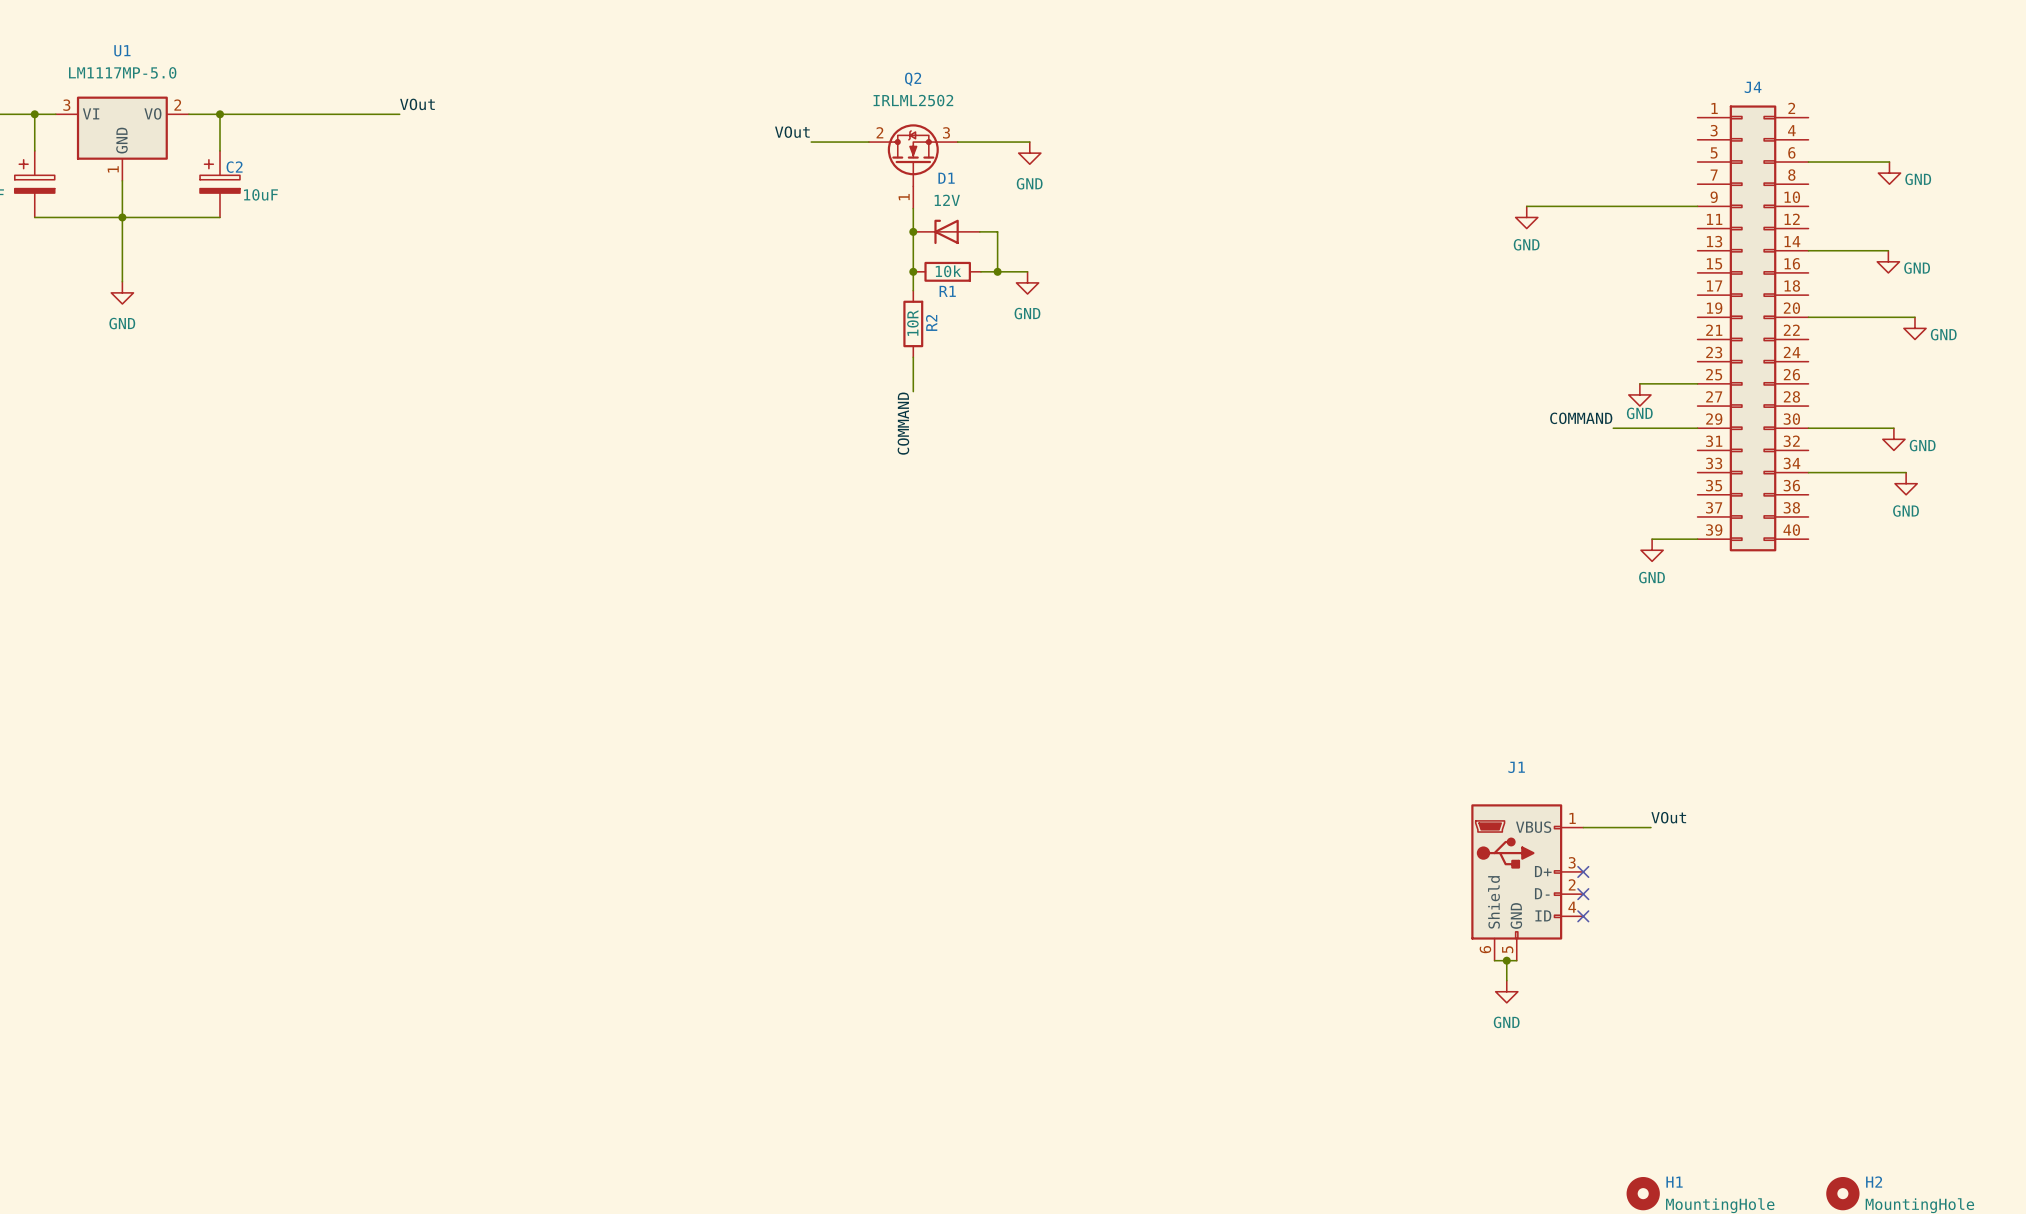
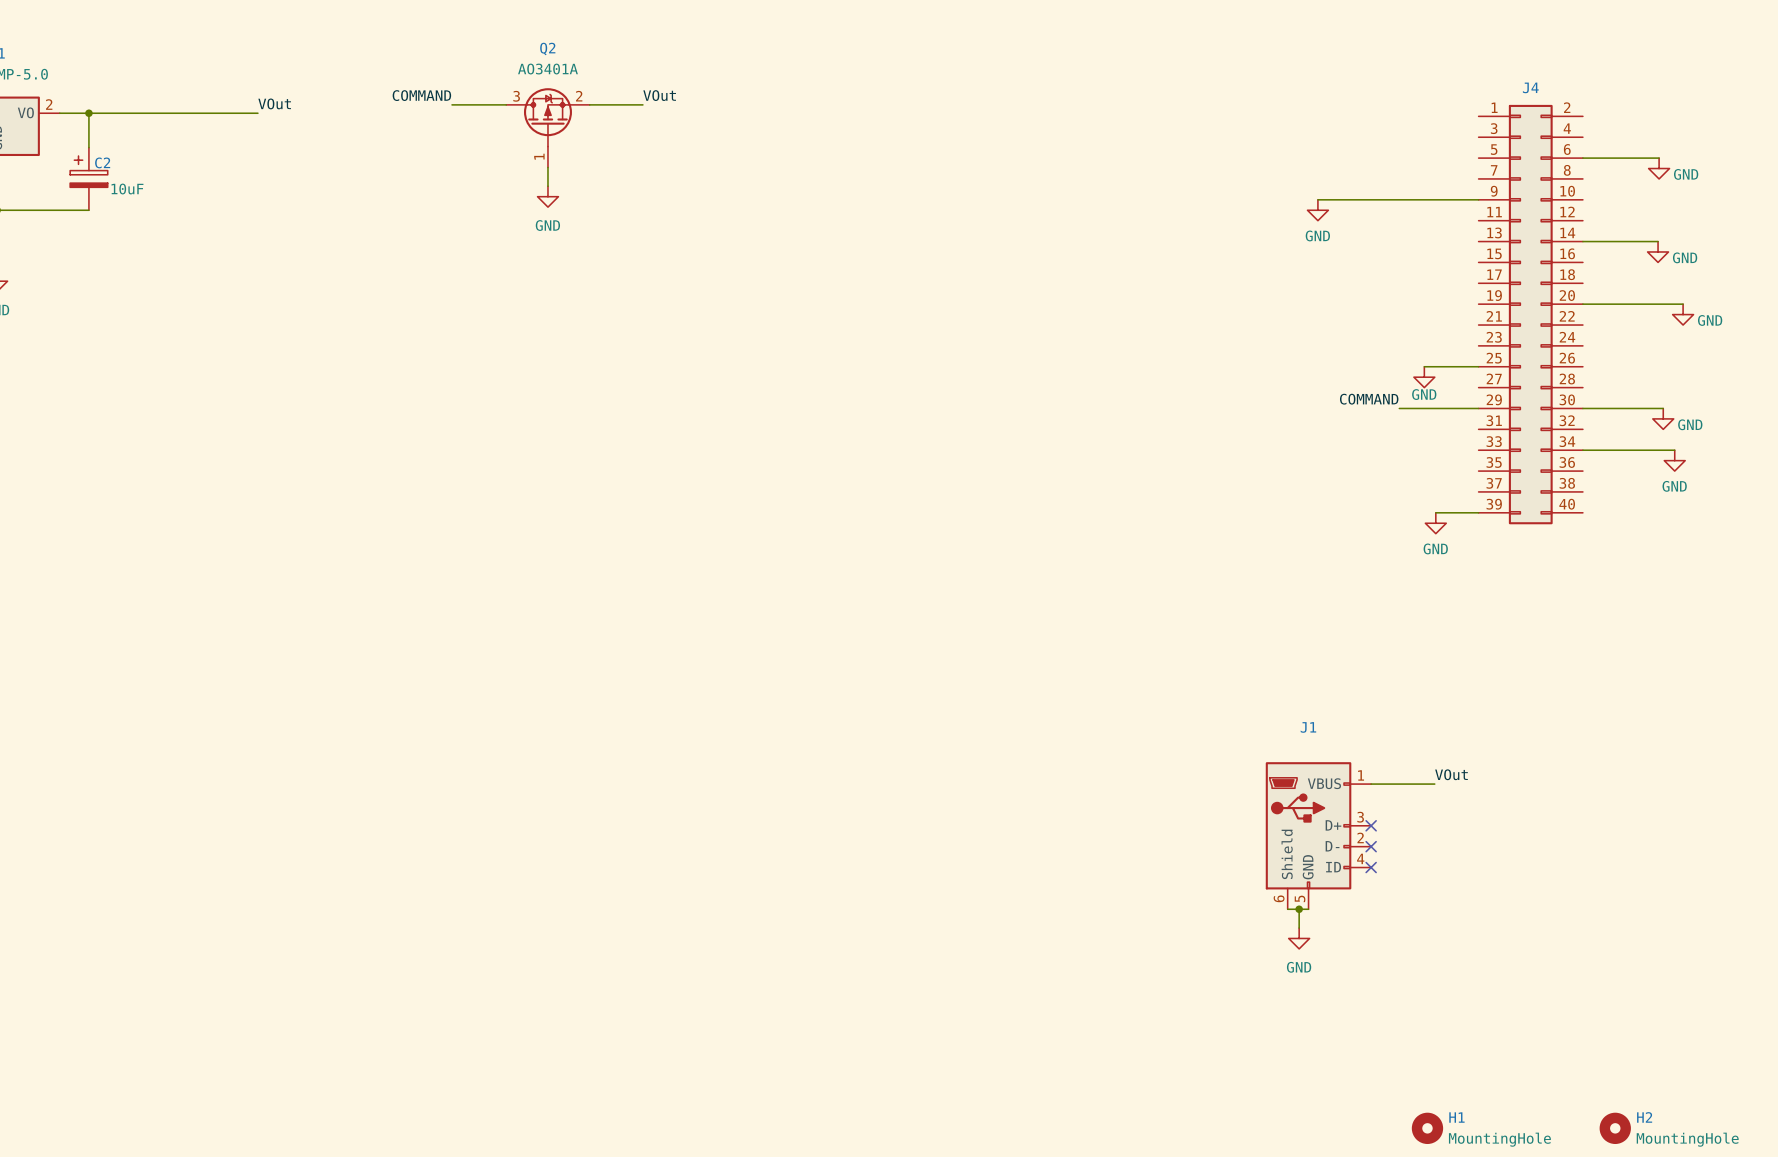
label: none -> COMMAND (421, 95)
Q2 value: IRLML2502 (913, 100) -> AO3401A (547, 69)
wire: none -> (589, 104) (642, 104)
Q2 symbol: [868, 124, 958, 209] -> [506, 88, 590, 168]
label position: VOut (792, 132) -> VOut (659, 95)
wire: (811, 142) (868, 142) -> (452, 104) (506, 104)
wire: (957, 142) (1029, 142) -> none
power symbol: GND (1029, 153) -> none
wire: none -> (547, 167) (547, 186)
power symbol: none -> GND (547, 196)
wire: (913, 208) (913, 290) -> none
junction: (913, 231) -> none
D1: 12V (946, 231) -> none
wire: (979, 231) (997, 231) (997, 271) -> none
junction: (913, 271) -> none
R1: 10k (947, 271) -> none
wire: (980, 271) (1027, 271) -> none
junction: (997, 271) -> none
power symbol: GND (1027, 282) -> none
R2: 10R (913, 323) -> none
wire: (913, 357) (913, 391) -> none
label: COMMAND (903, 423) -> none

